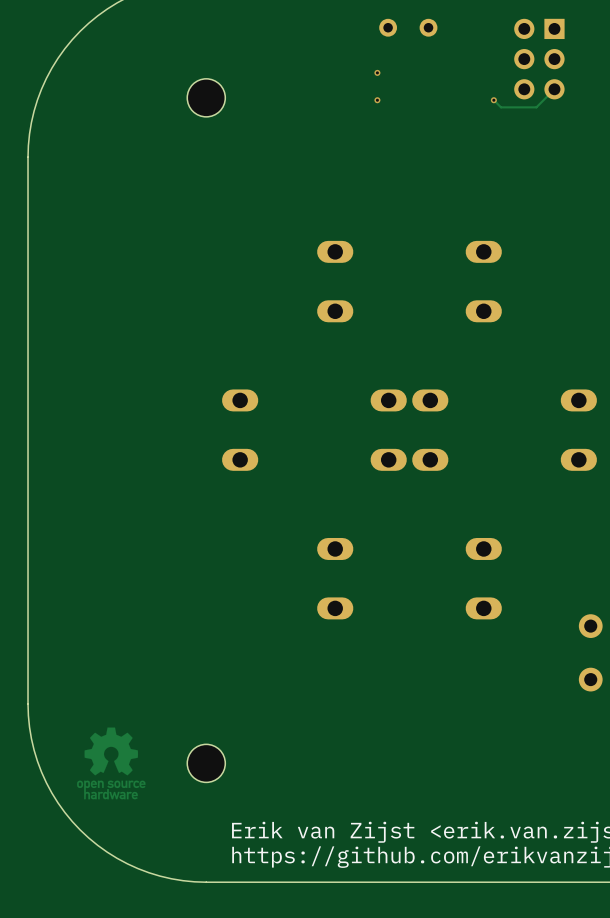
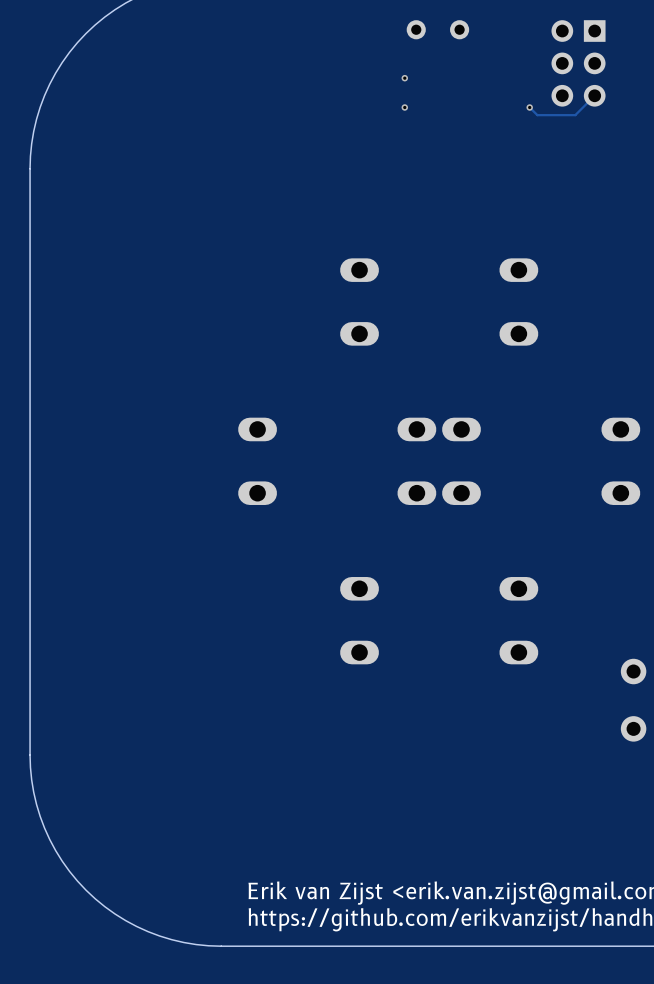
part: (206, 97) -> none
drawing: [77, 727, 146, 800] -> none
part: (206, 763) -> none

